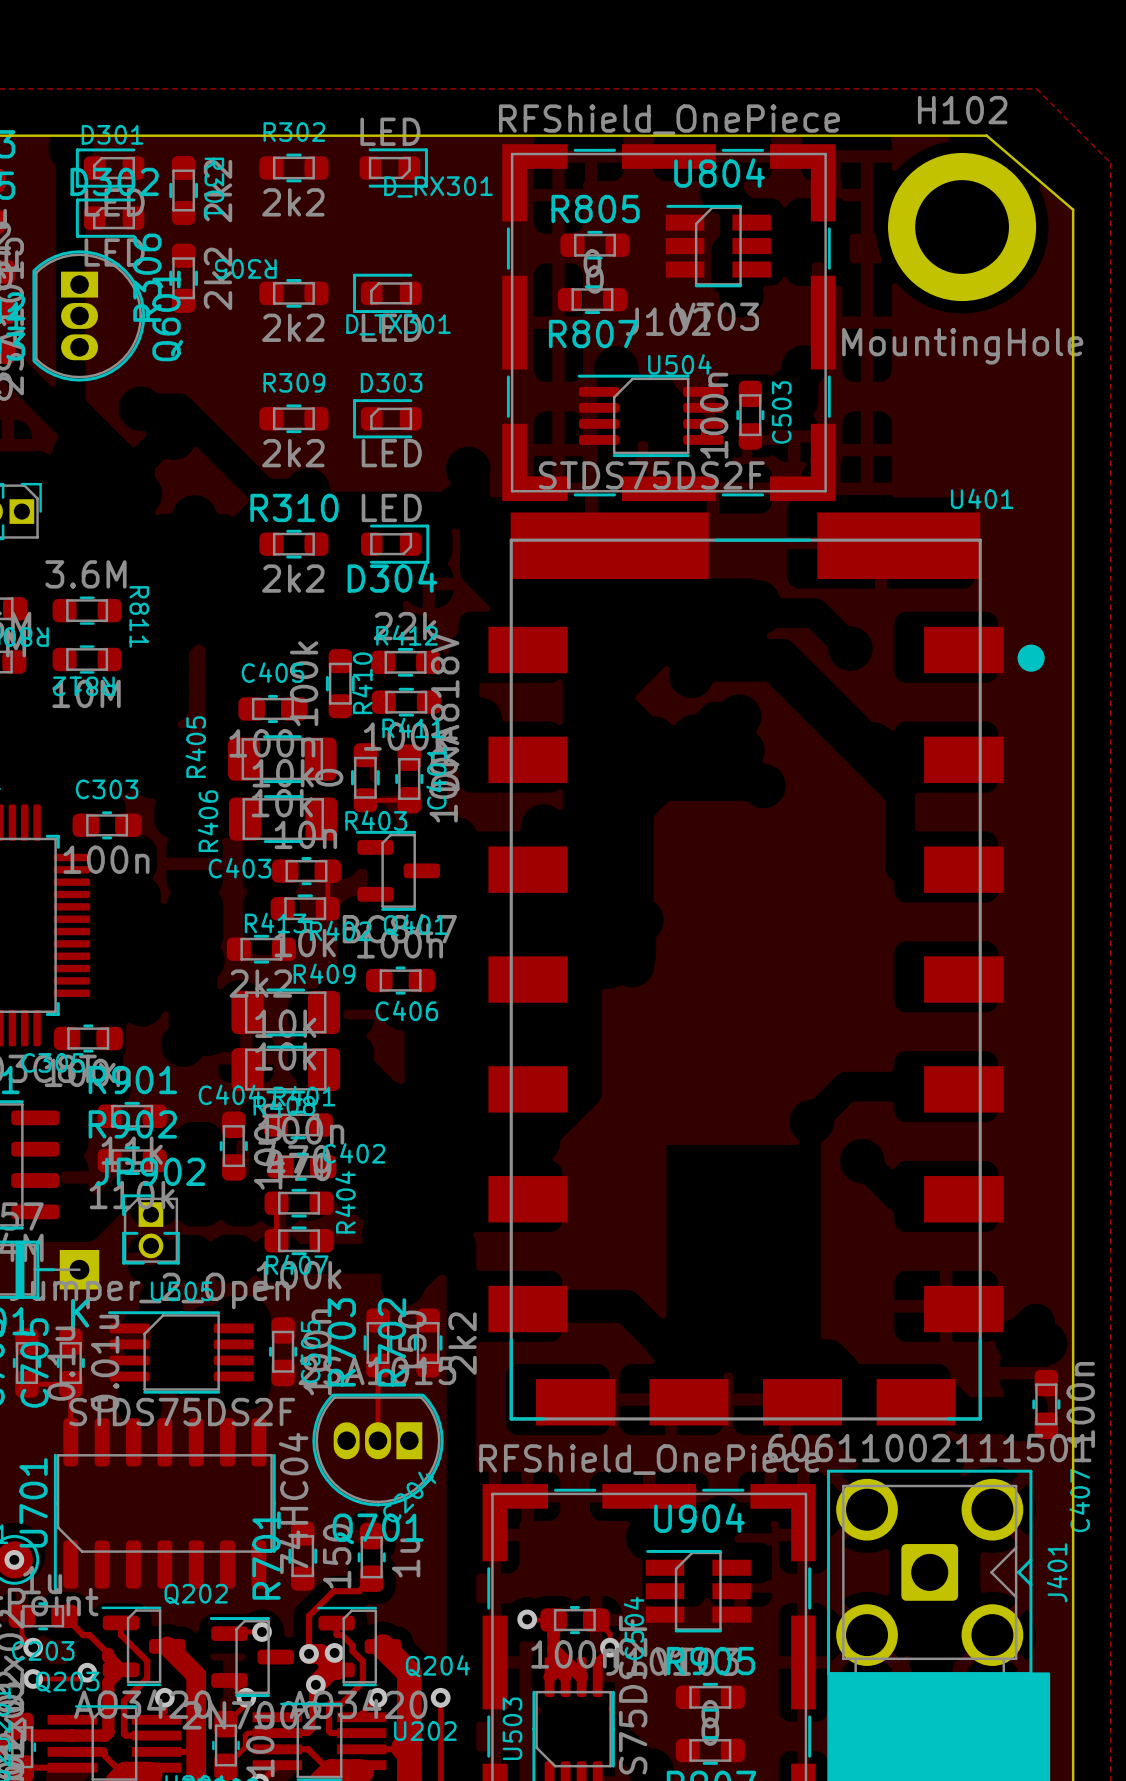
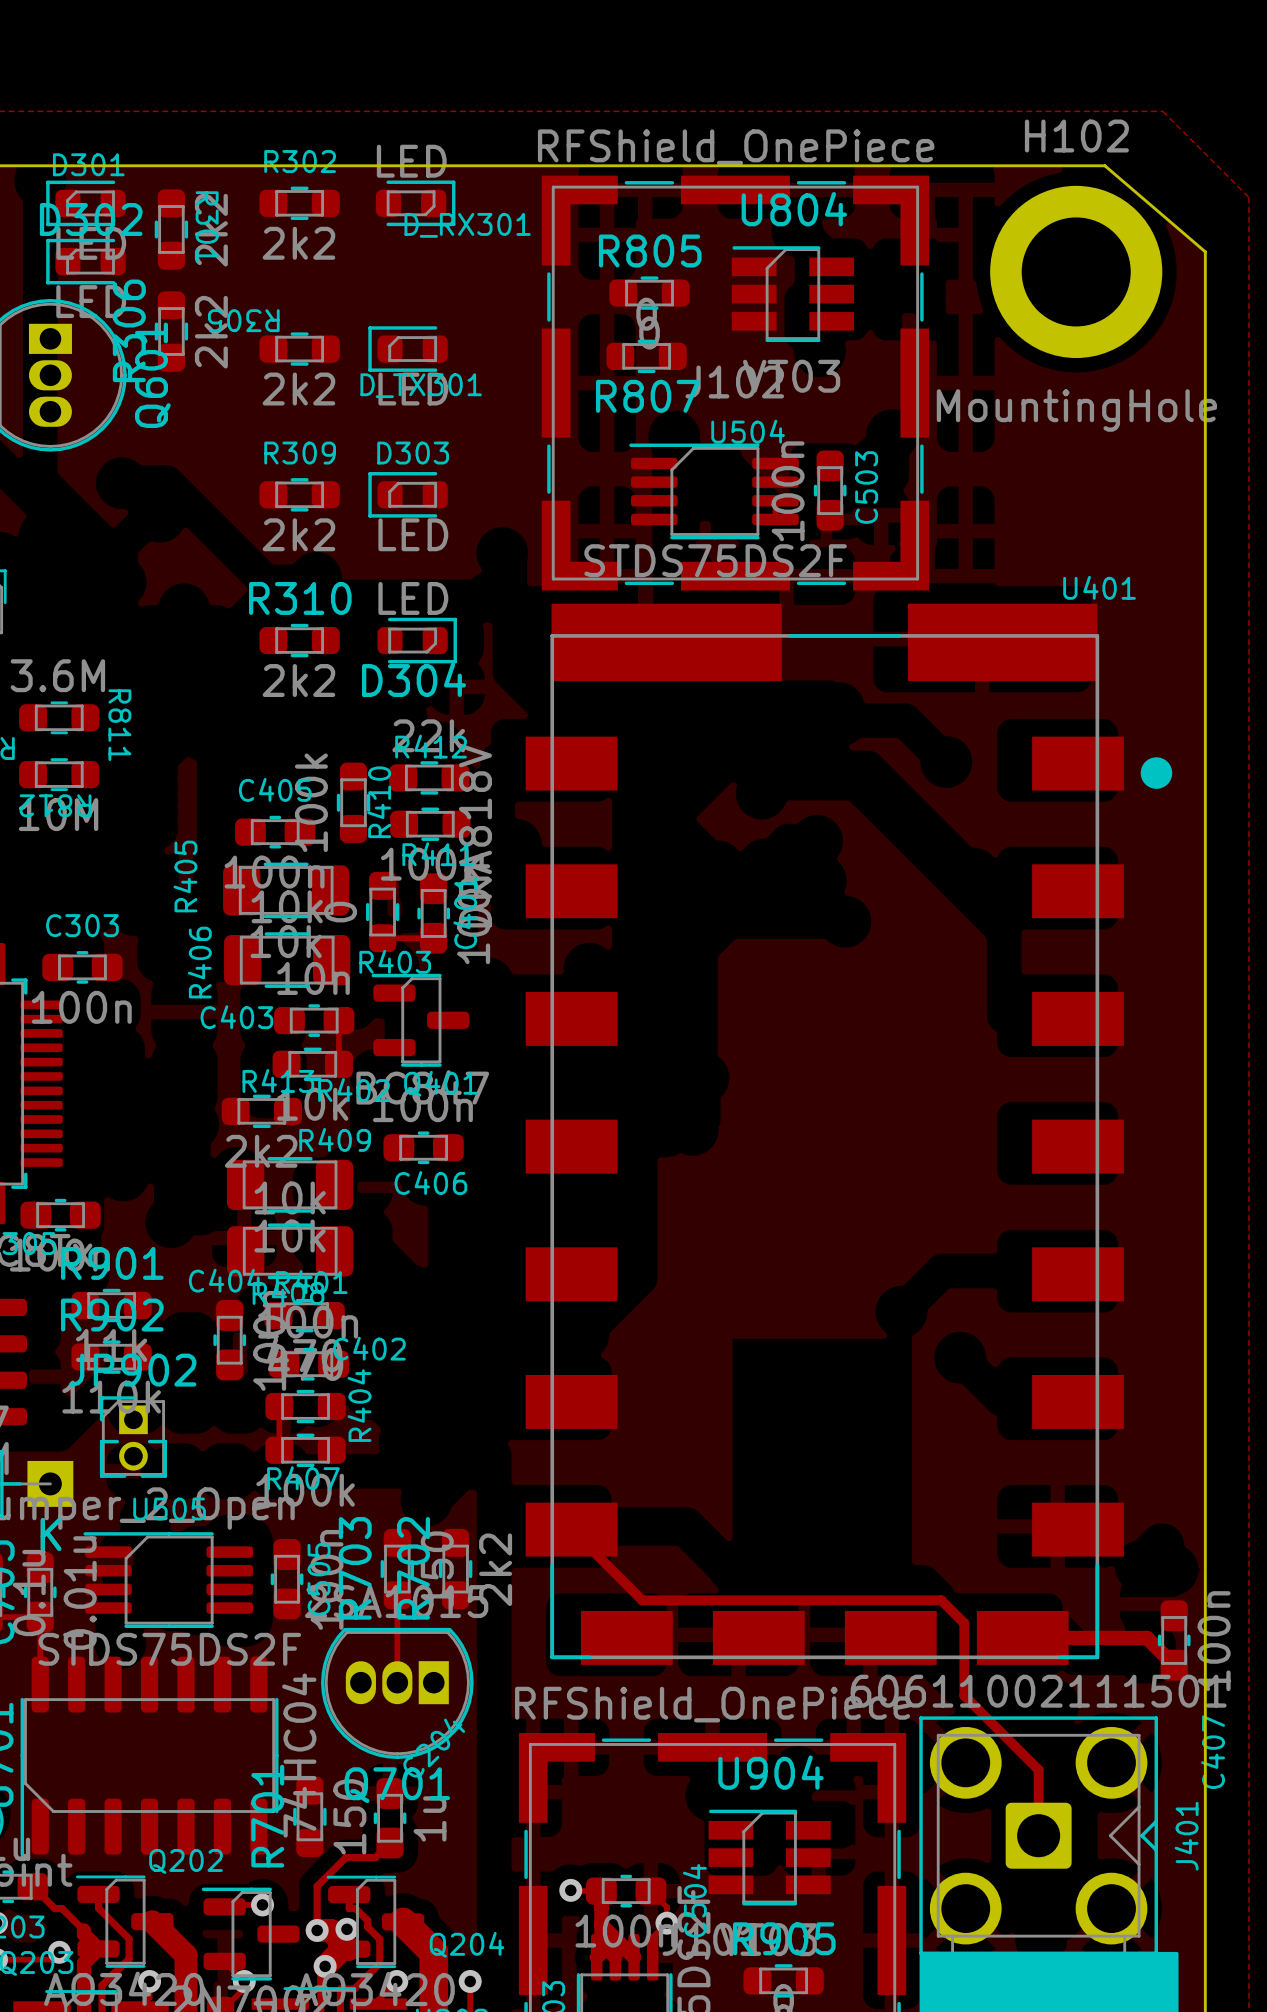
track: none -> (571, 1529) (642, 1600) (941, 1600) (964, 1623) (964, 1695) (1038, 1769) (1038, 1835)
track: none -> (1022, 1637) (1146, 1637) (1174, 1665)

